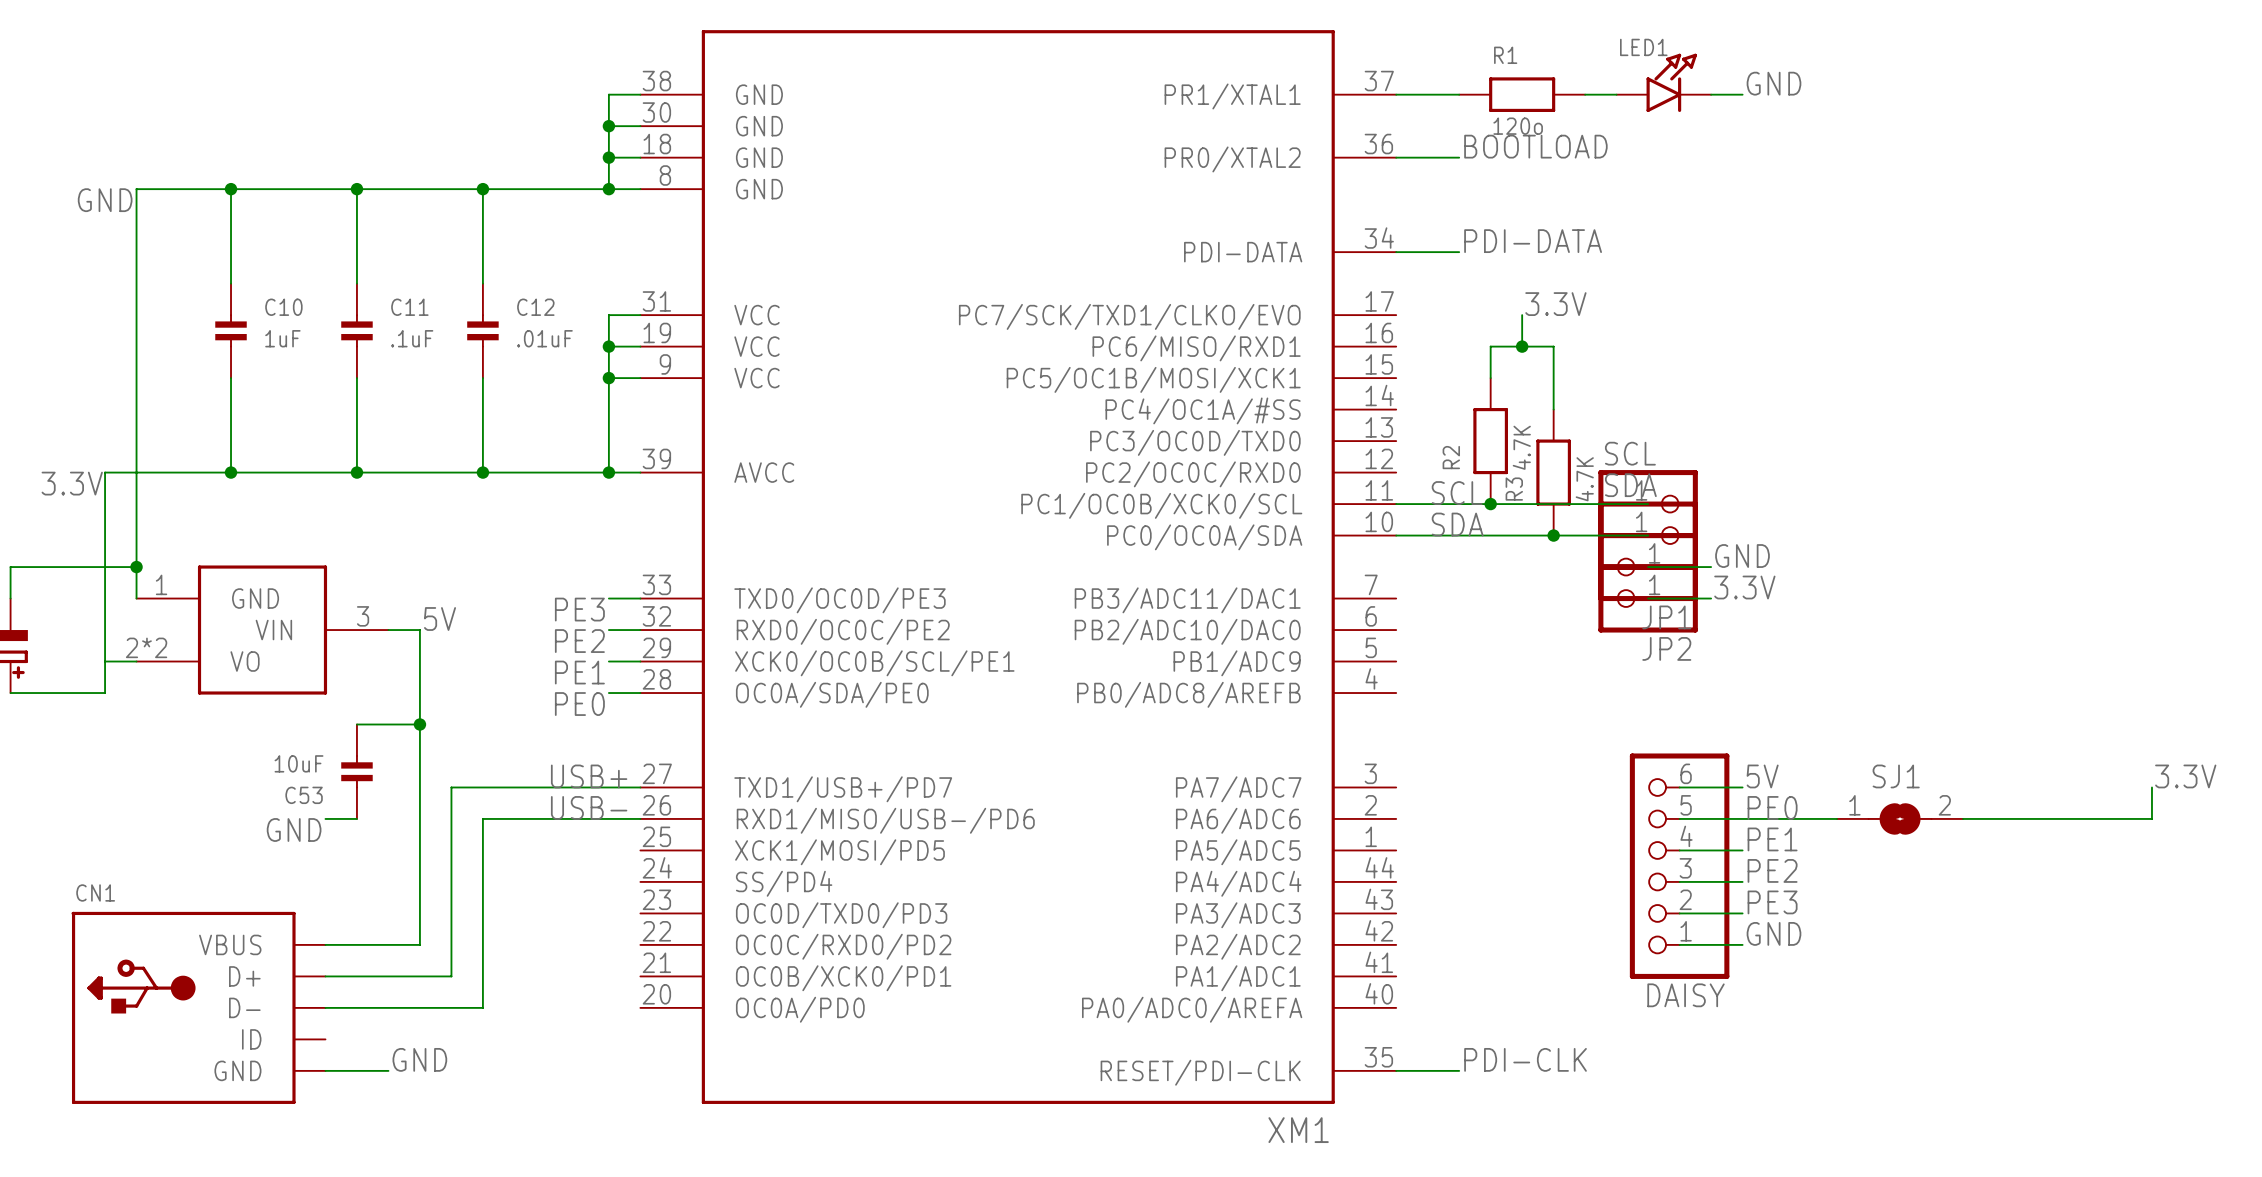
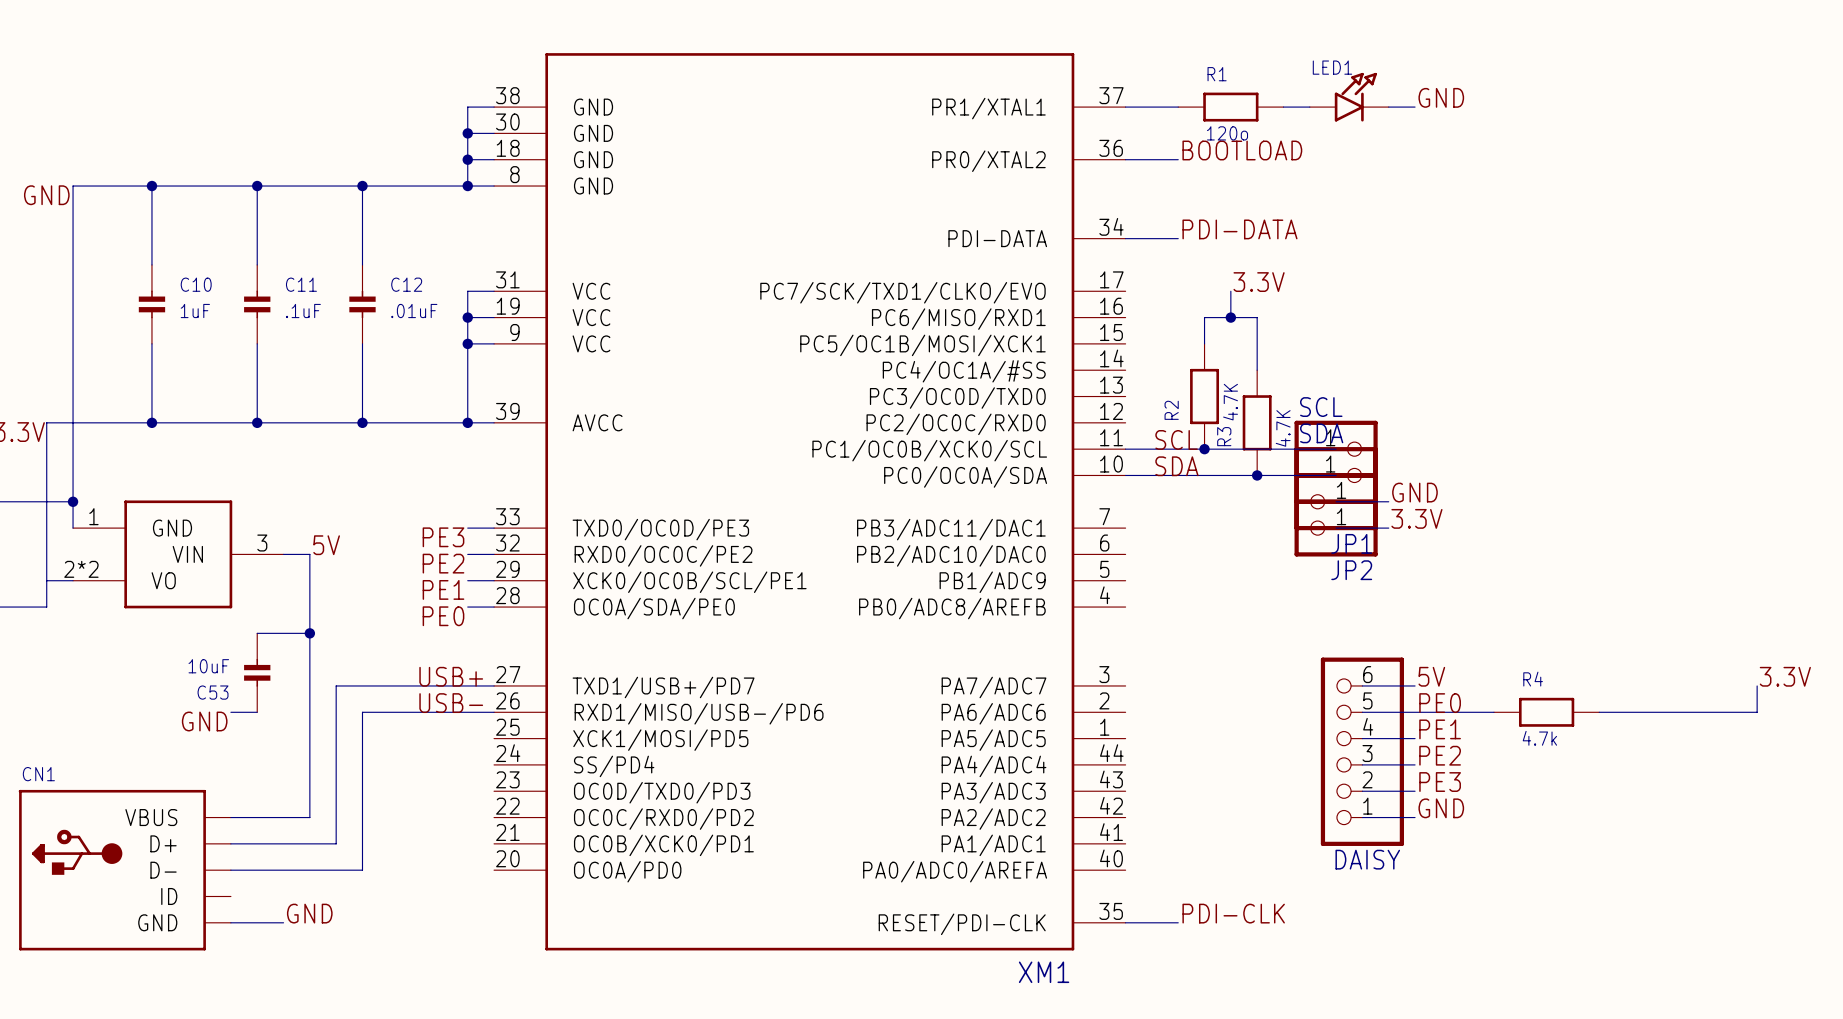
SJ1: (1900, 818) -> none
R4: none -> 4.7k (1546, 712)

